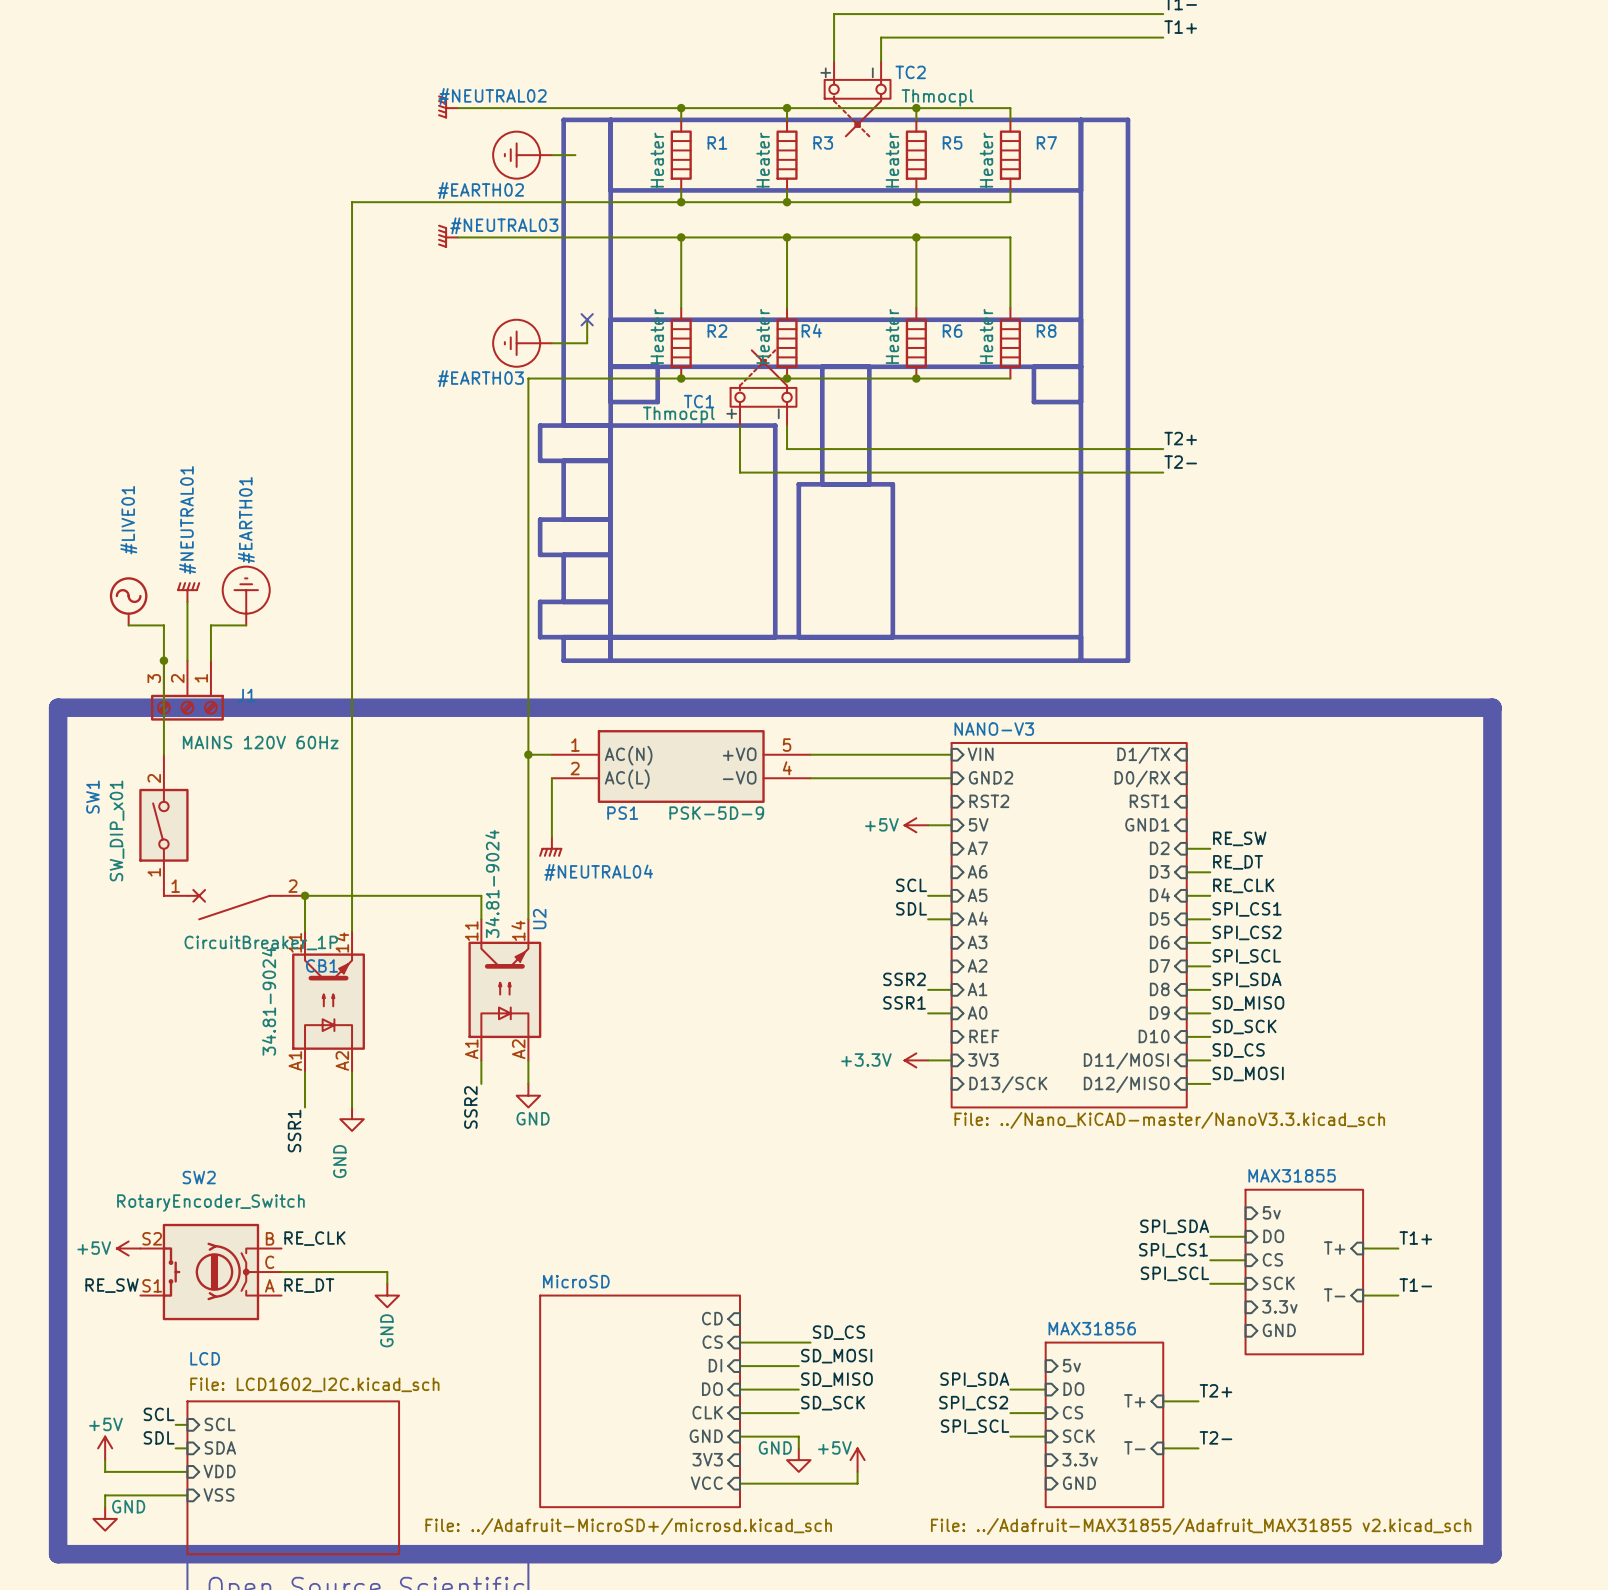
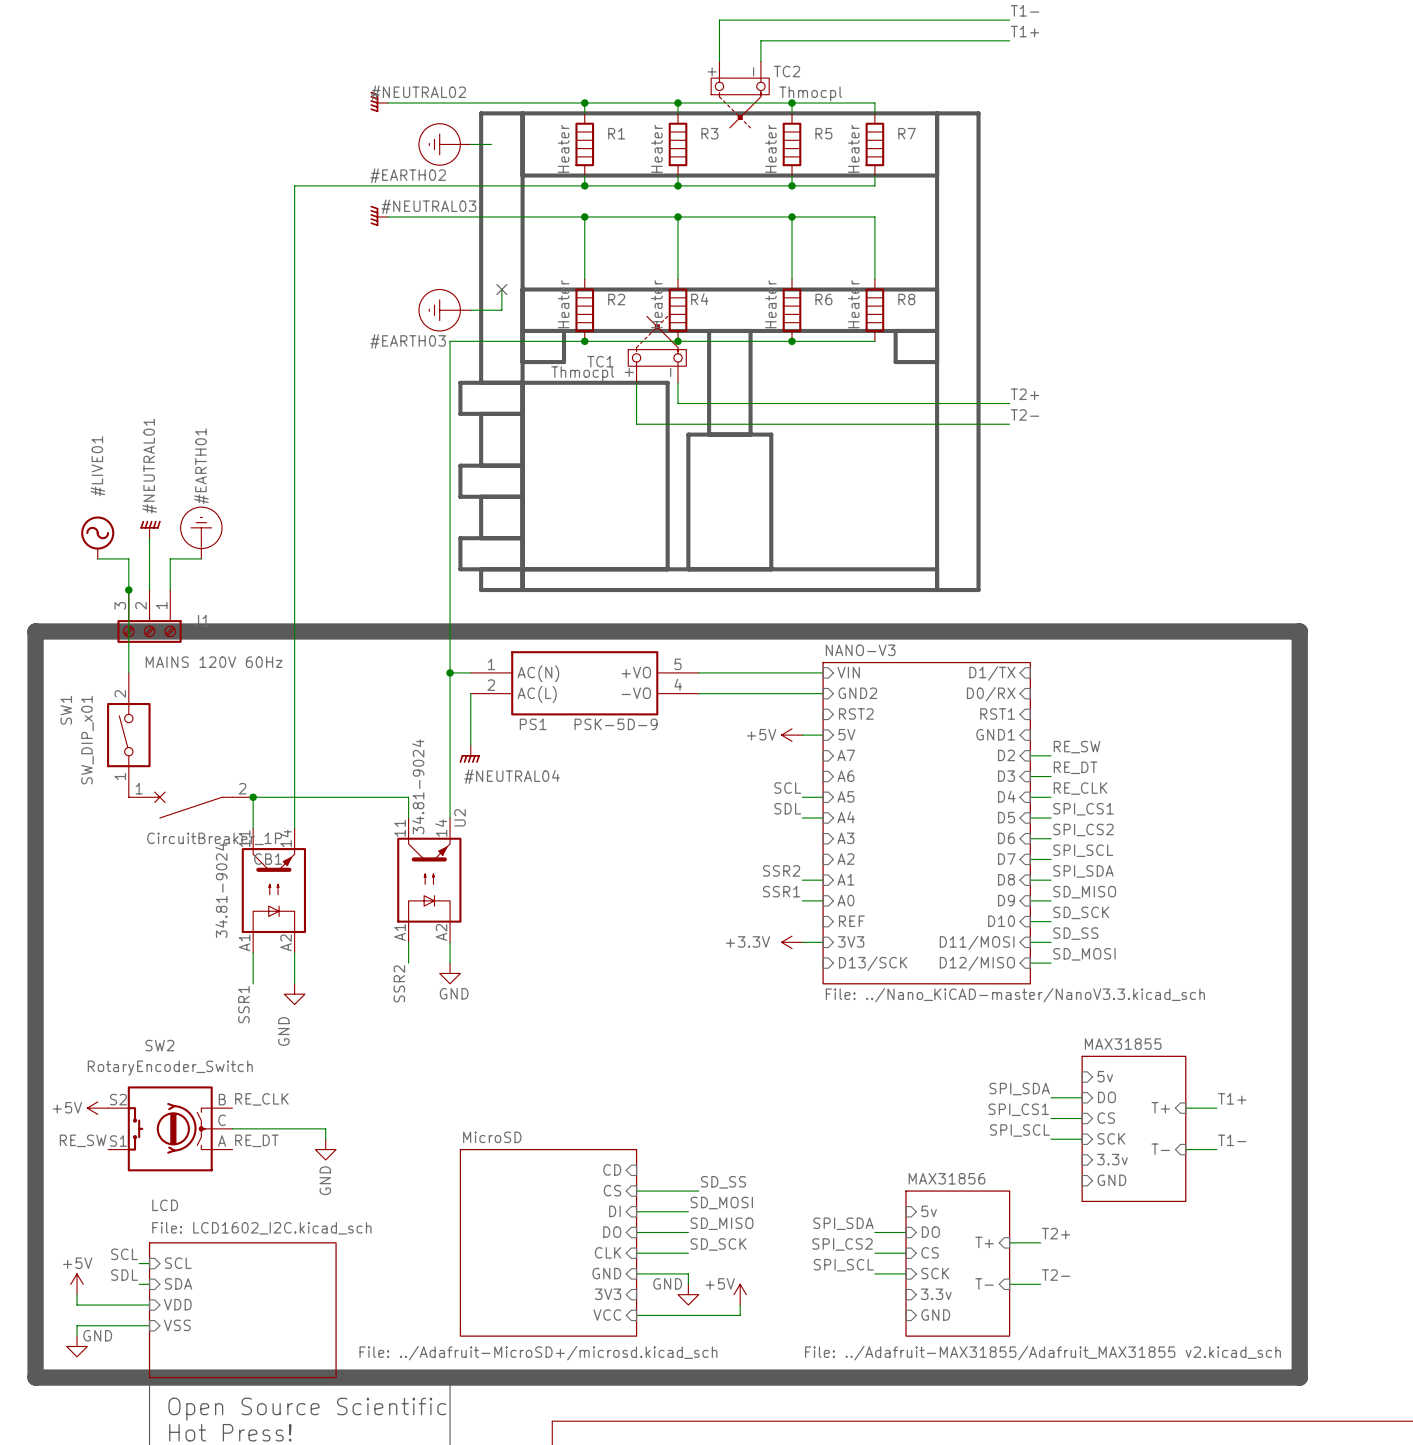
label: SD_CS (1238, 1050) -> SD_SS (1075, 933)
label: SD_CS (838, 1332) -> SD_SS (723, 1182)

